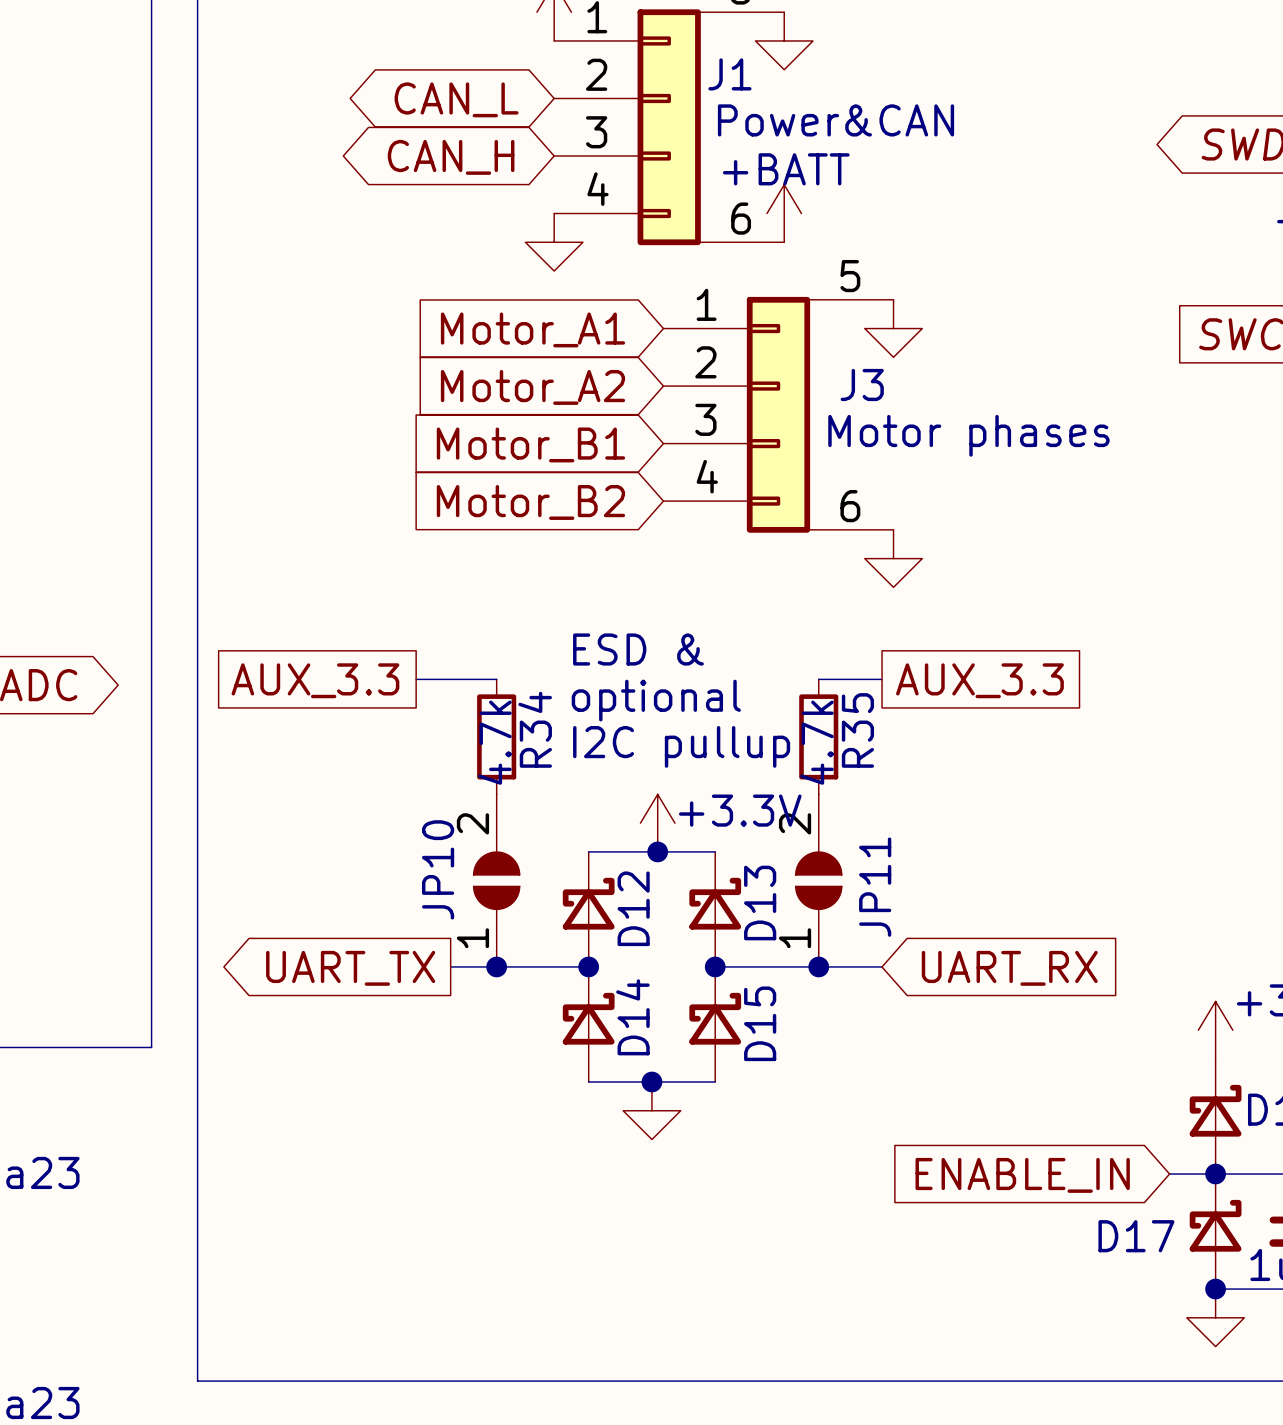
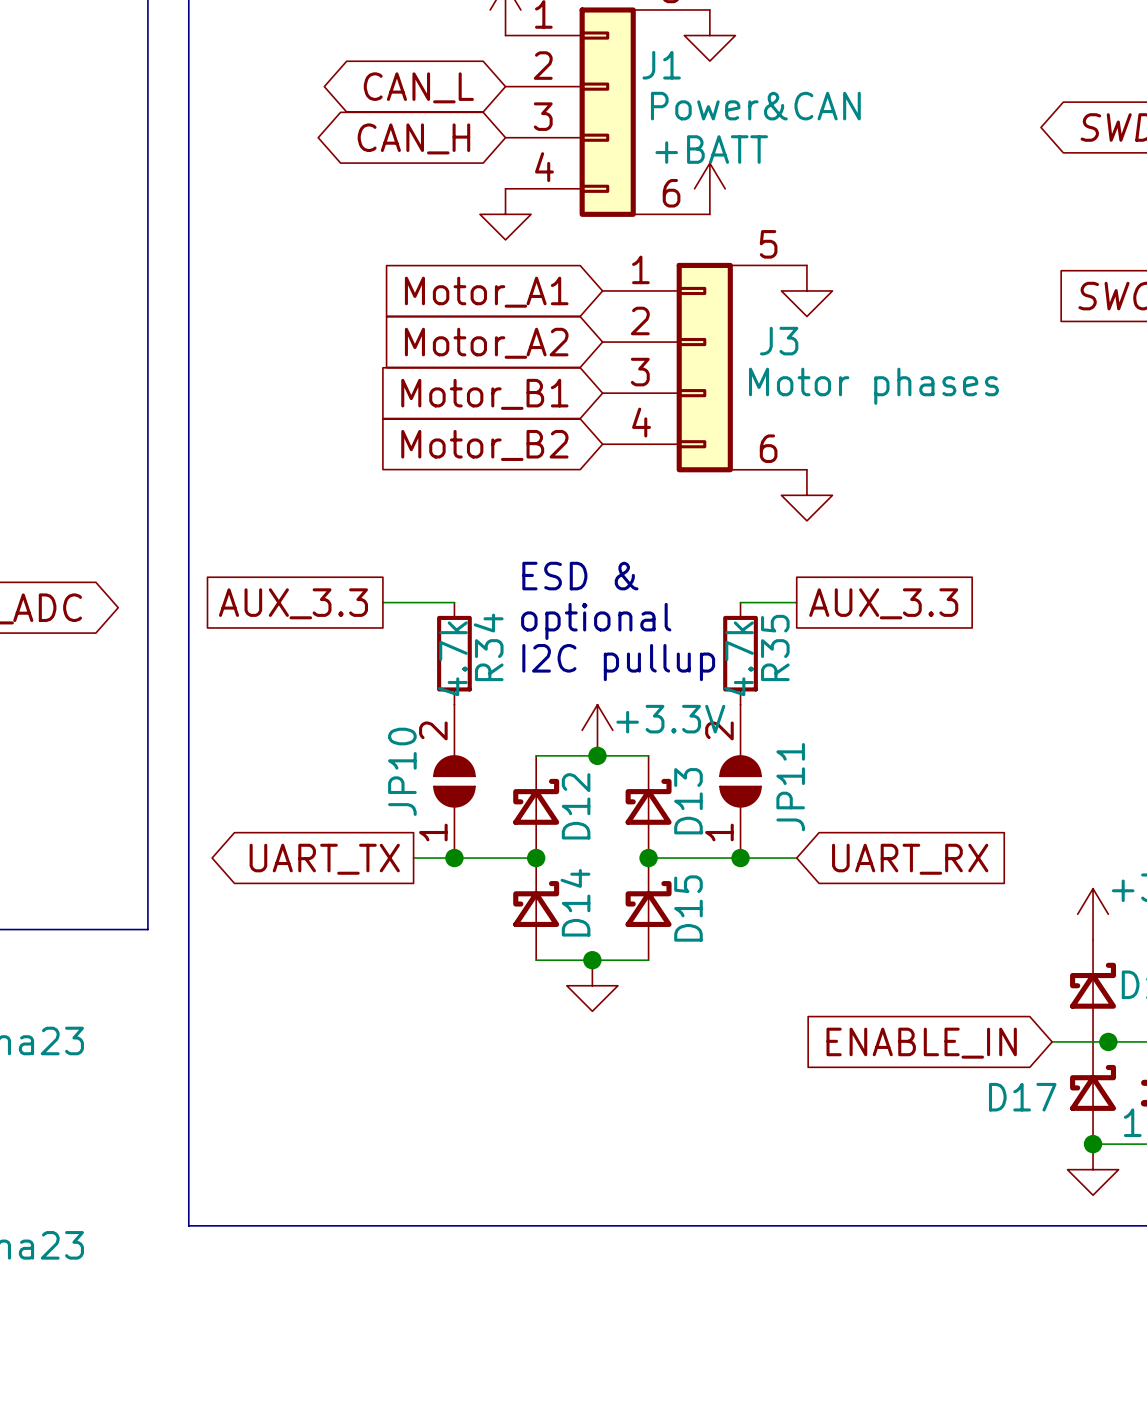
junction position: (1215, 1174) -> (1108, 1041)

